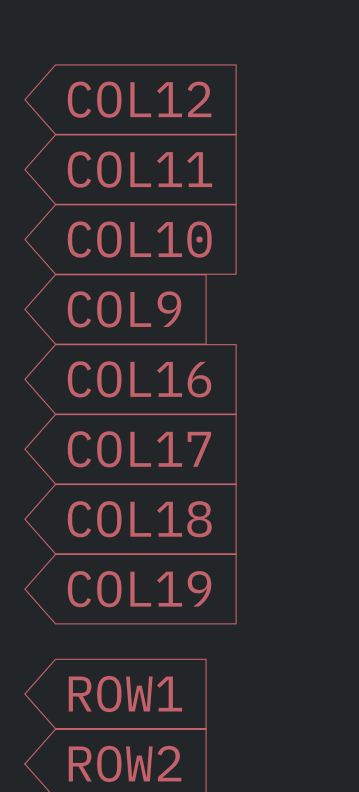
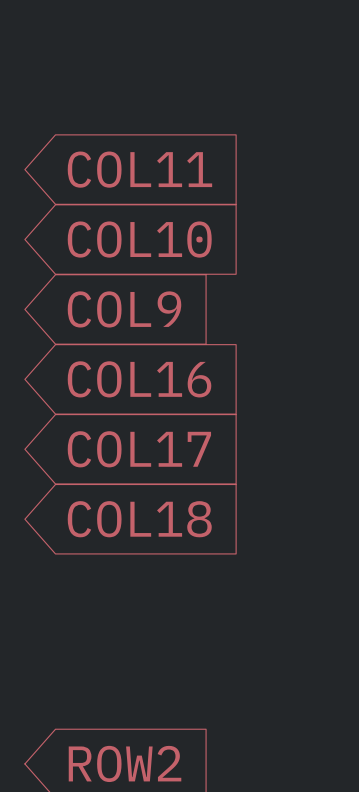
global label: COL12 (139, 99) -> none
global label: COL19 (139, 589) -> none
global label: ROW1 (125, 694) -> none

